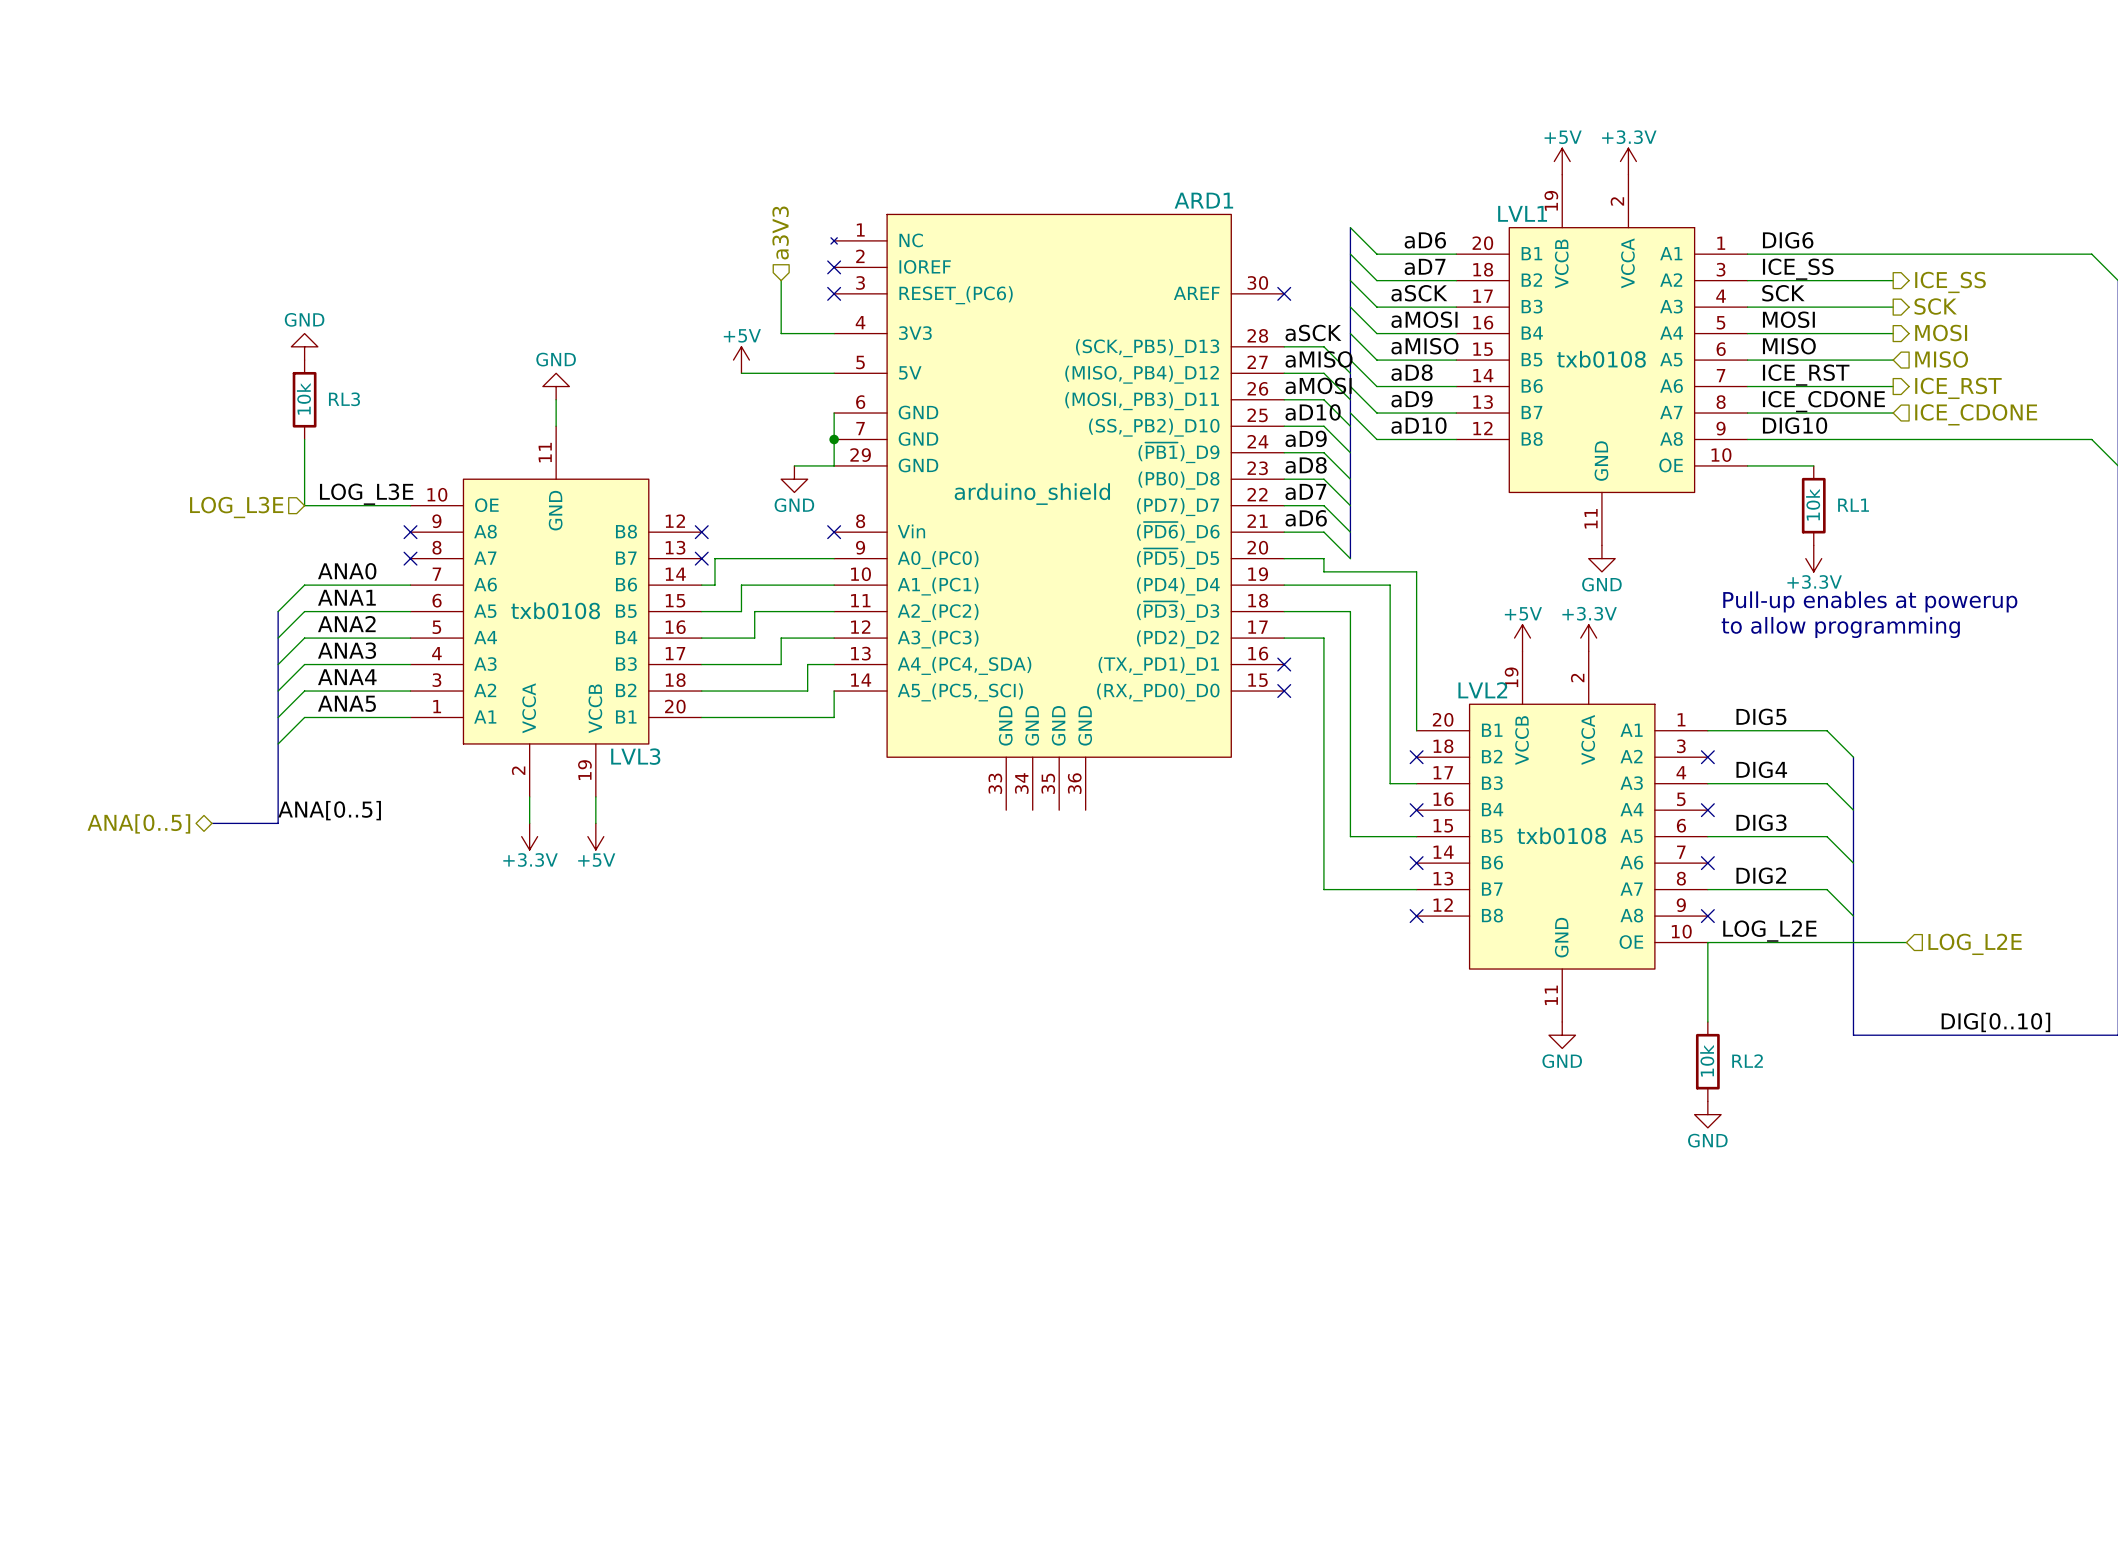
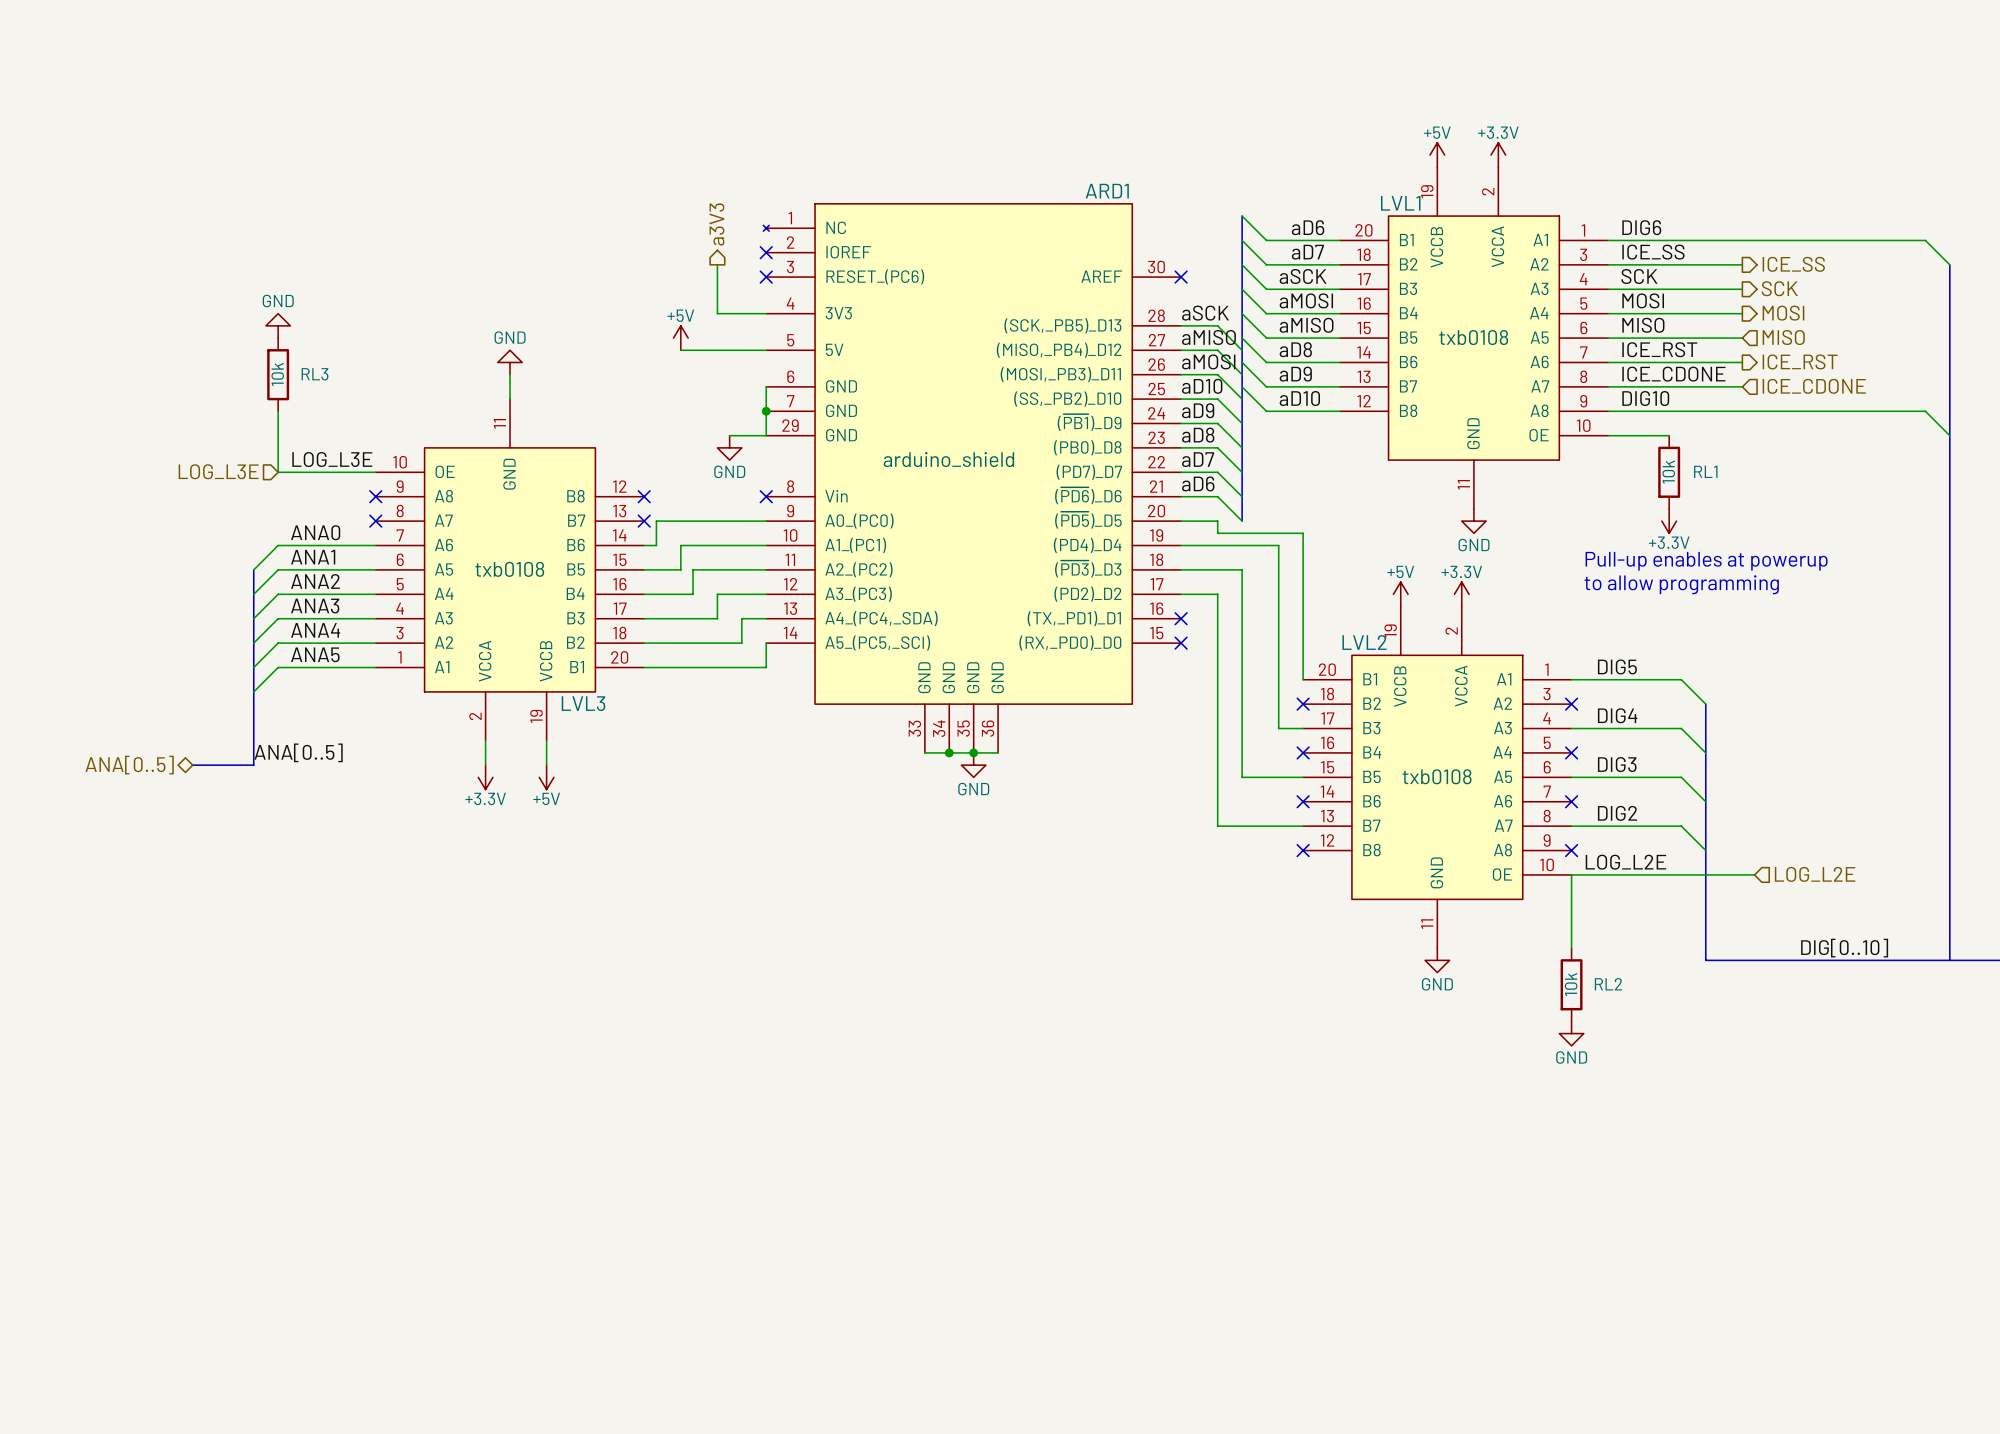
hierarchical label shape: input (780, 233) -> output (716, 224)
wire: none -> (924, 752) (998, 752)
junction: none -> (949, 752)
junction: none -> (973, 752)
power symbol: none -> GND (973, 765)

